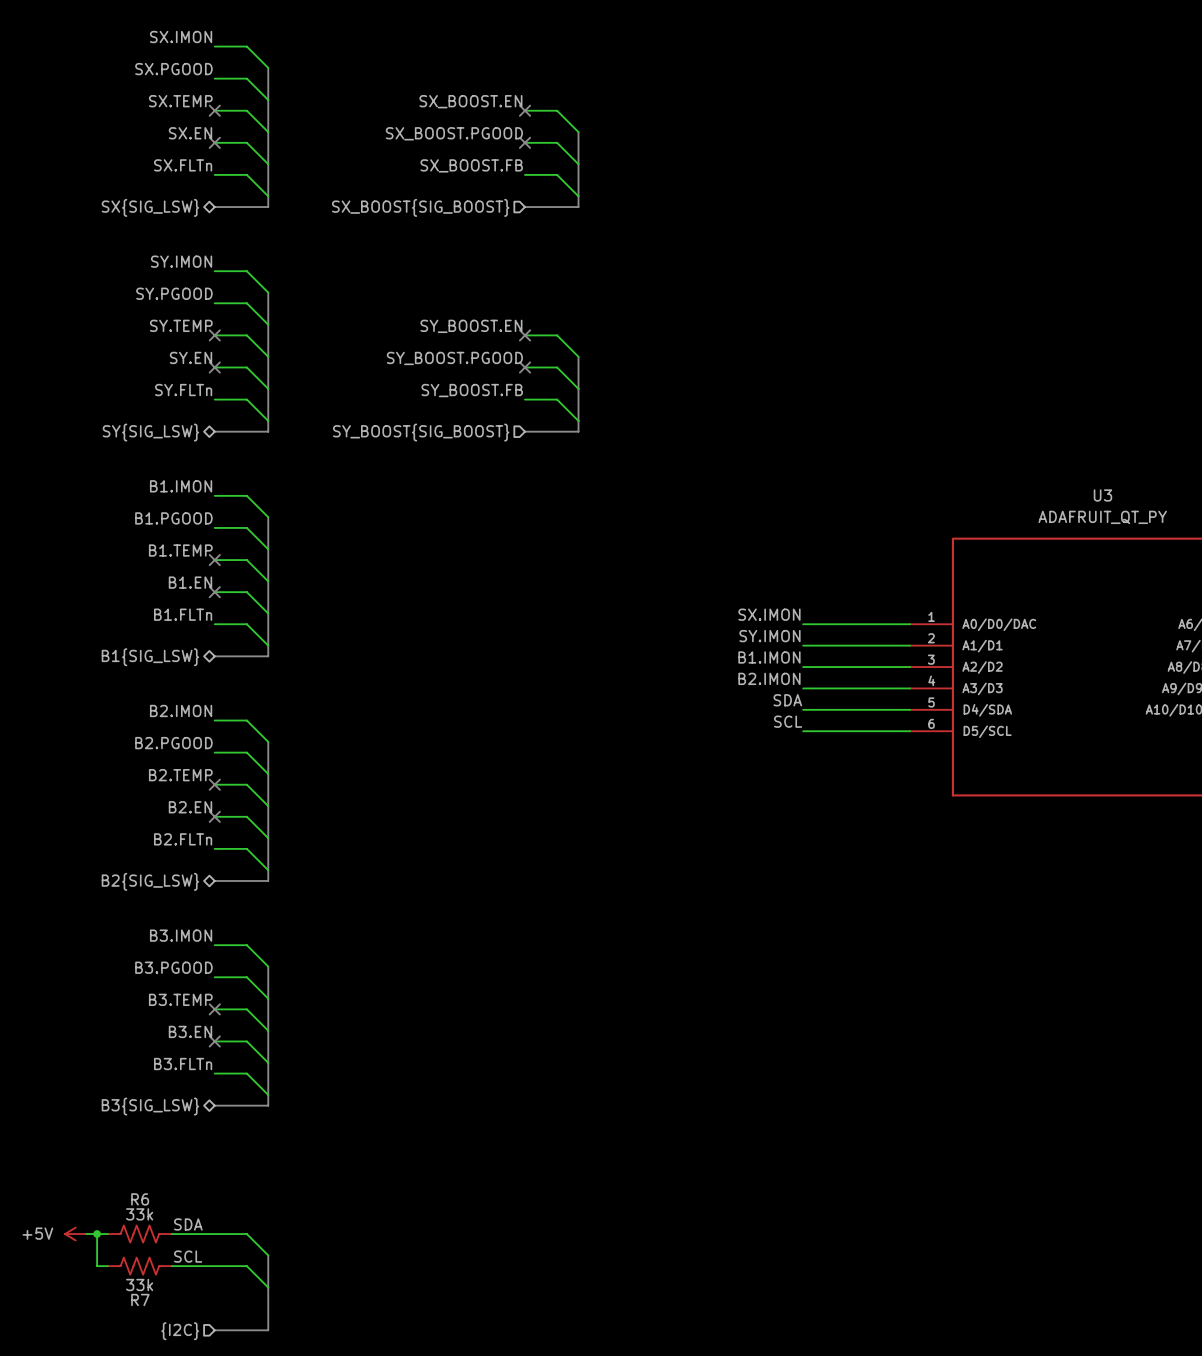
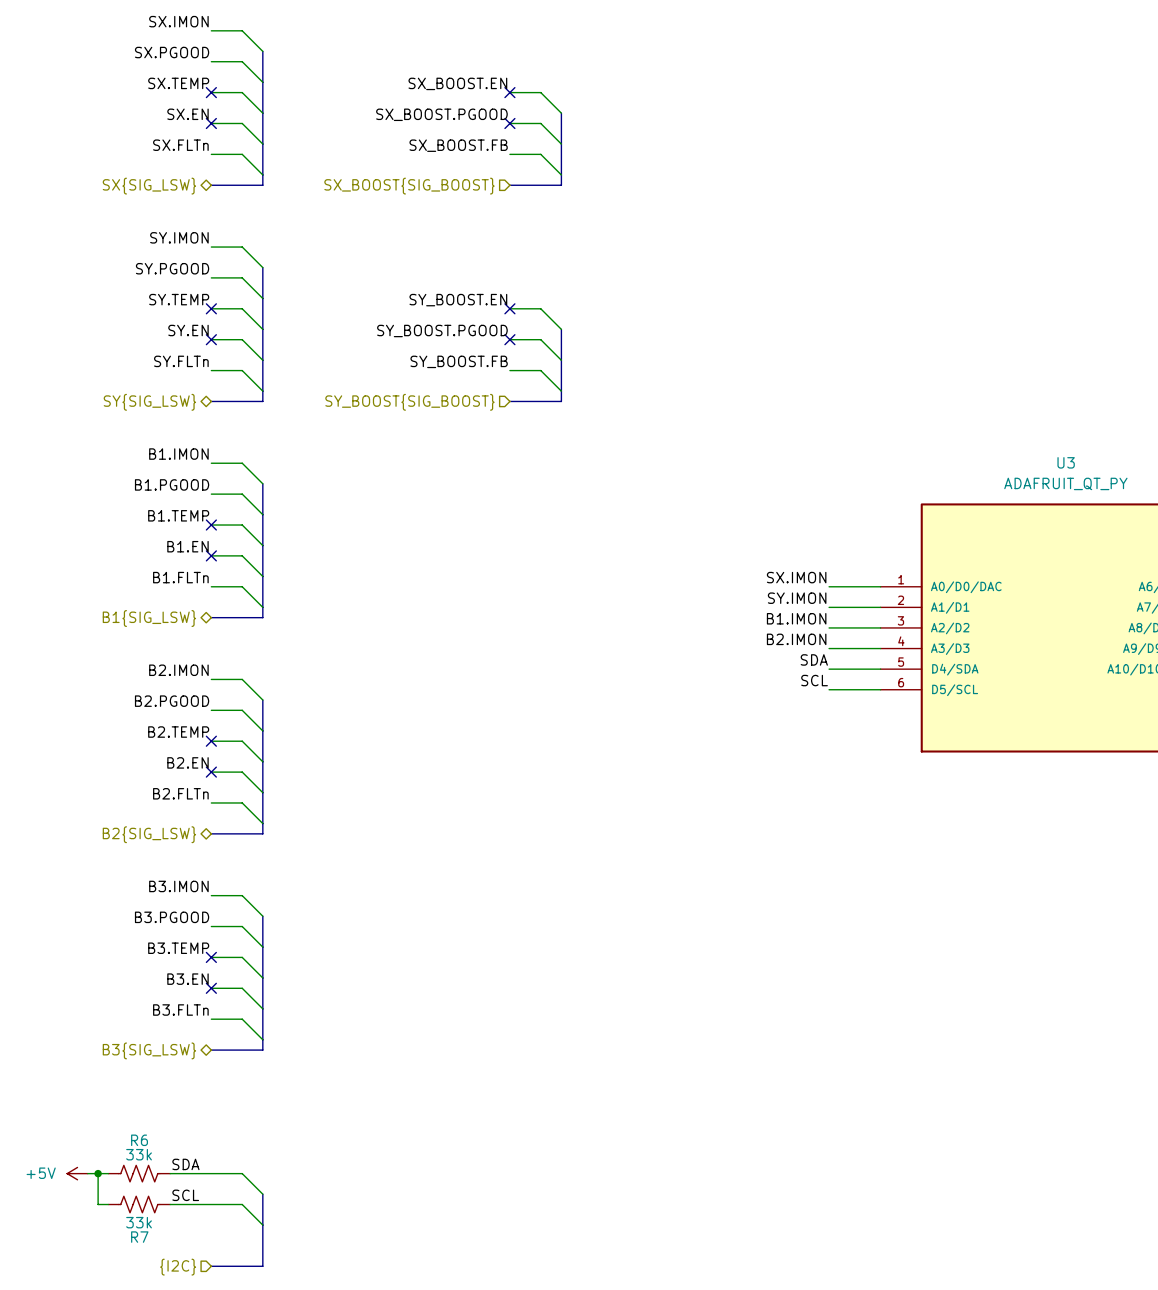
label position: SX.IMON (769, 614) -> SX.IMON (796, 577)
wire: (803, 624) (856, 624) -> none
label position: SY.IMON (769, 636) -> SY.IMON (797, 598)
wire: (803, 645) (856, 645) -> none
label position: B1.IMON (769, 657) -> B1.IMON (796, 618)
wire: (803, 667) (856, 667) -> none
label position: B2.IMON (769, 678) -> B2.IMON (796, 639)
wire: (803, 688) (856, 688) -> none
label position: SDA (787, 700) -> SDA (814, 659)
wire: (803, 709) (856, 709) -> none
label position: SCL (788, 721) -> SCL (814, 680)
wire: (803, 731) (856, 731) -> none

